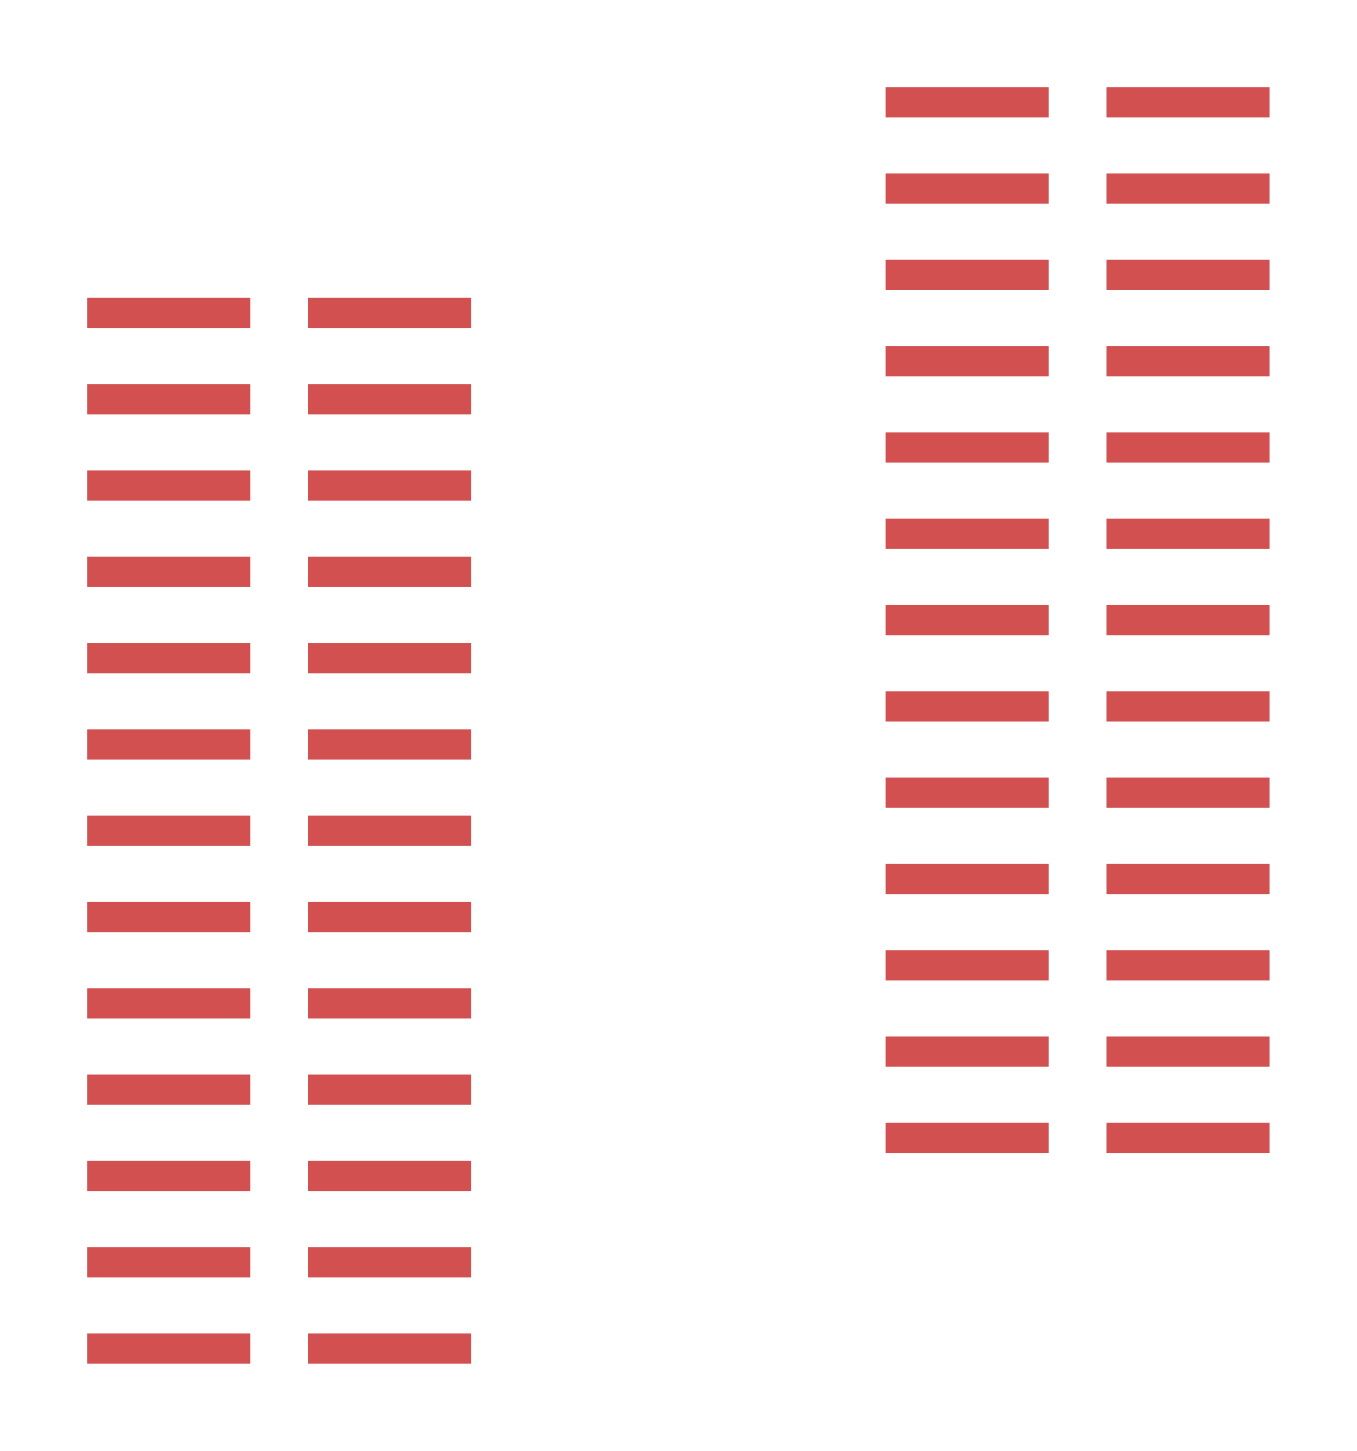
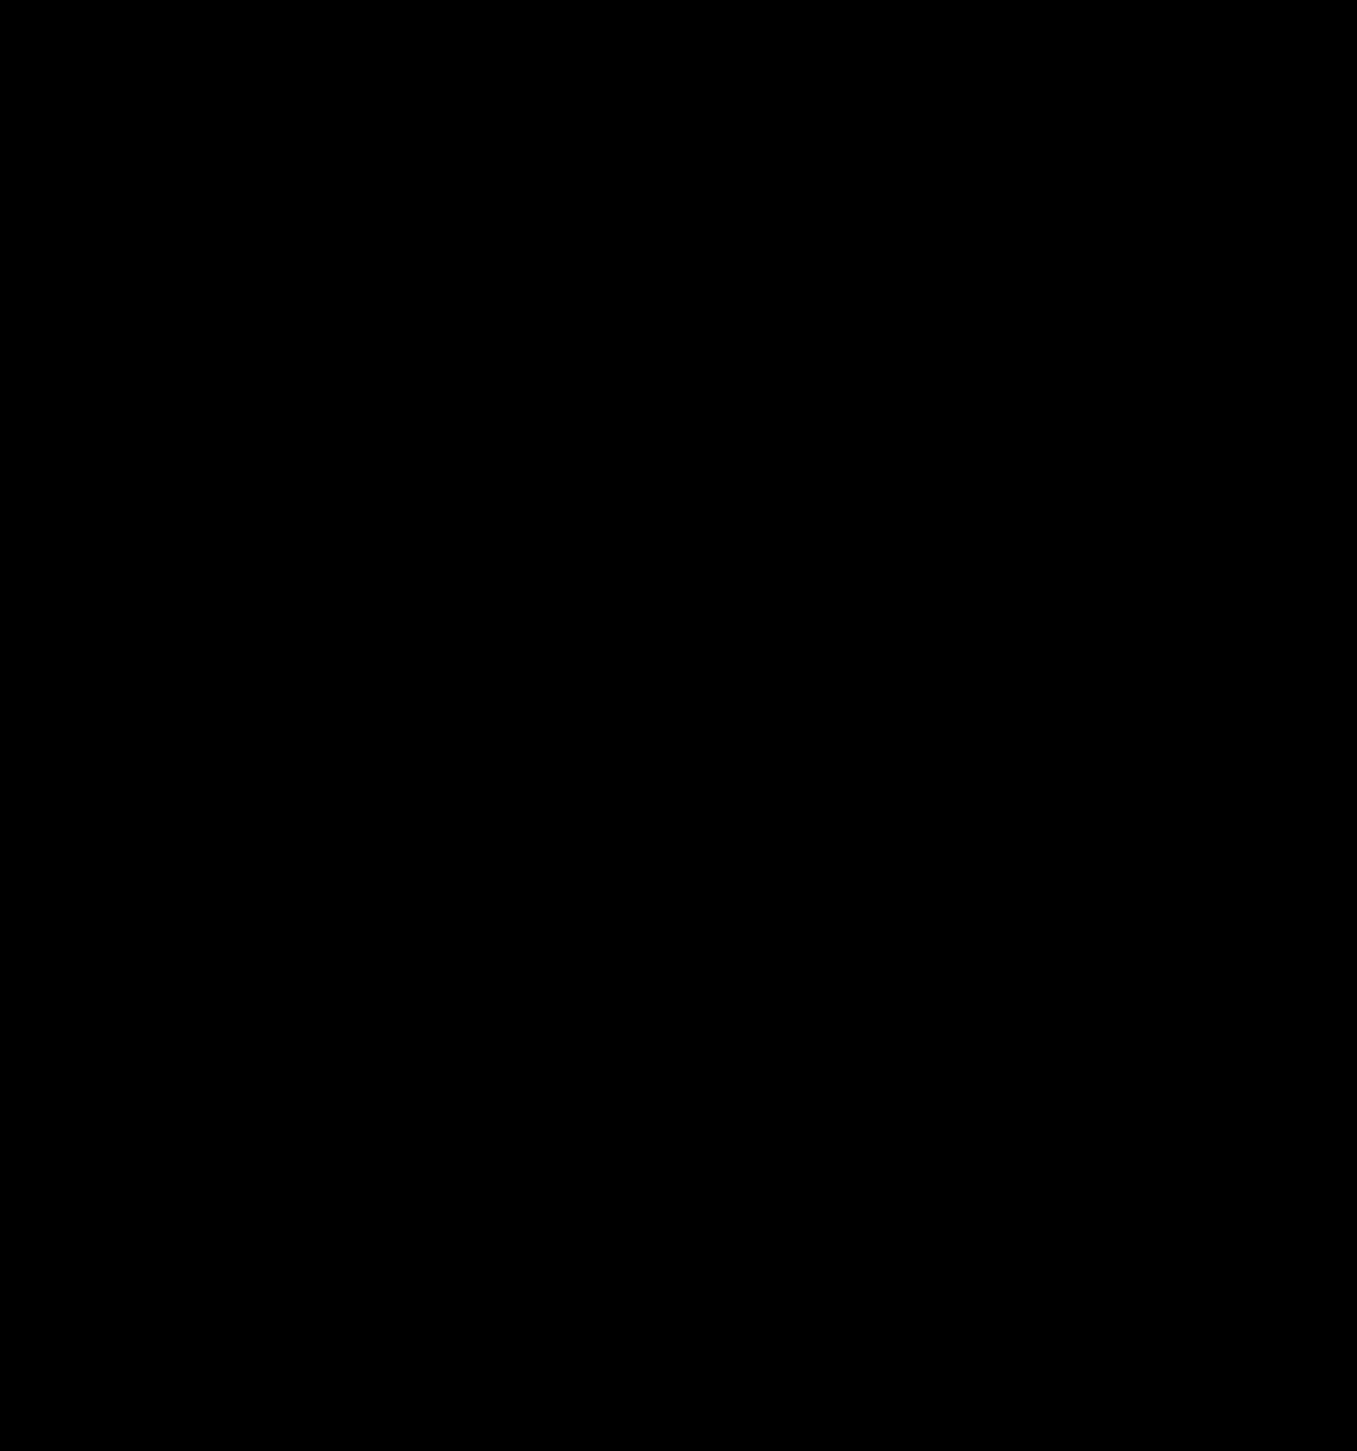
part: (1077, 620) -> none
part: (279, 830) -> none

